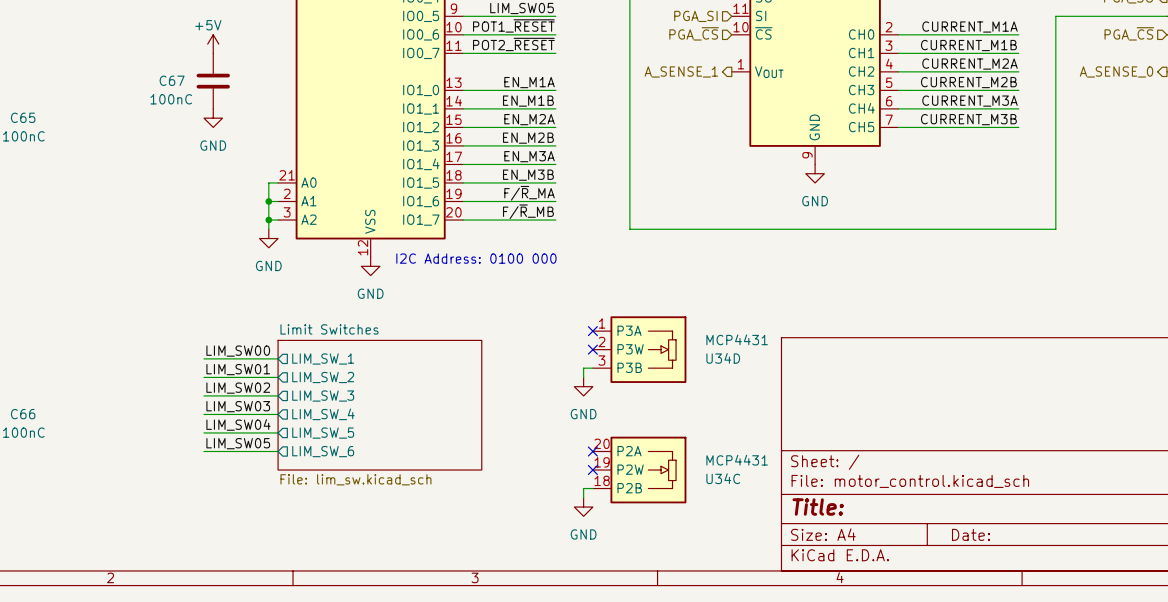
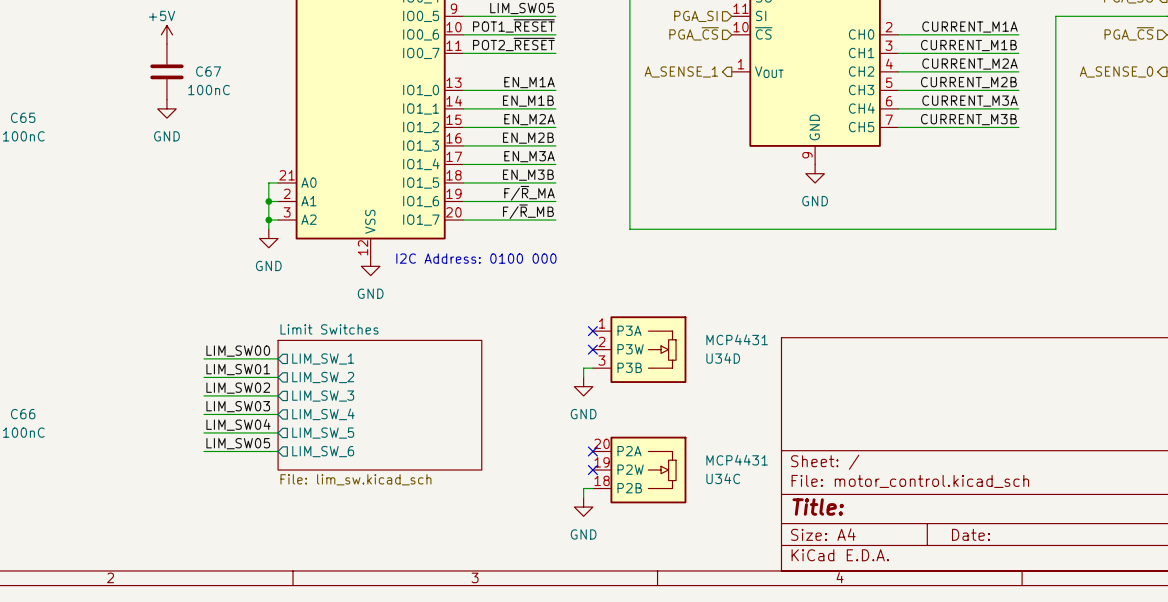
power symbol position: +5V (213, 44) -> +5V (166, 34)
C67 name position: C67 (172, 80) -> C67 (208, 71)
C67 position: (213, 81) -> (166, 71)
C67 value position: 100nC (171, 99) -> 100nC (209, 90)
power symbol position: GND (213, 118) -> GND (166, 108)

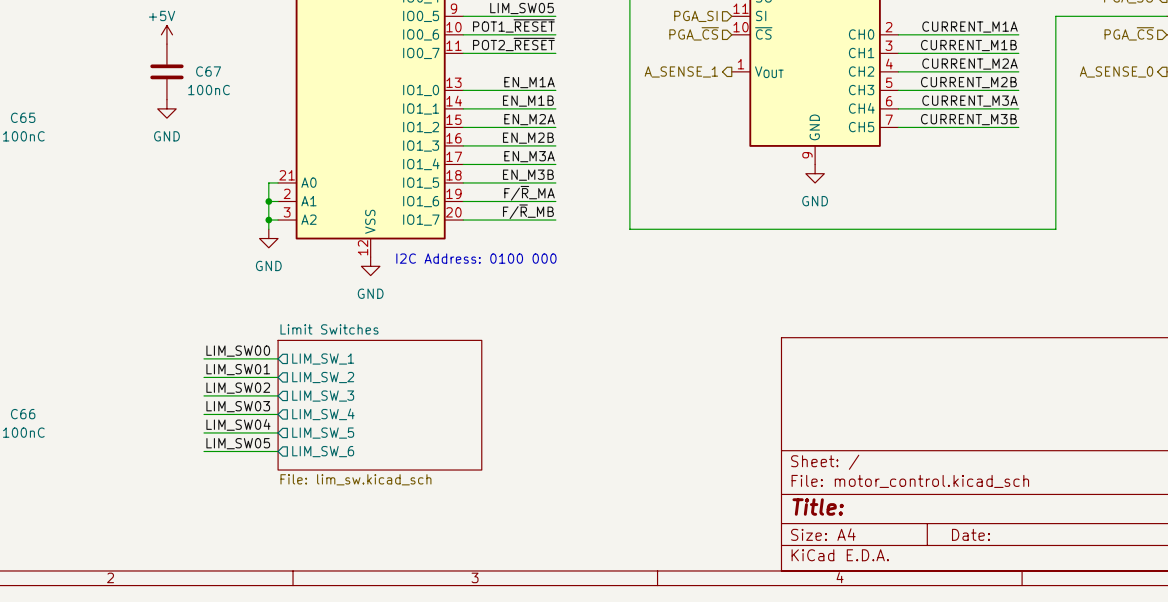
no-connect mark: (592, 331) -> none
no-connect mark: (592, 349) -> none
U34D: MCP4431 (639, 349) -> none
wire: (592, 368) (583, 368) (583, 377) -> none
power symbol: GND (583, 386) -> none
no-connect mark: (592, 451) -> none
no-connect mark: (592, 470) -> none
U34C: MCP4431 (639, 470) -> none
wire: (592, 488) (583, 488) (583, 497) -> none
power symbol: GND (583, 507) -> none

